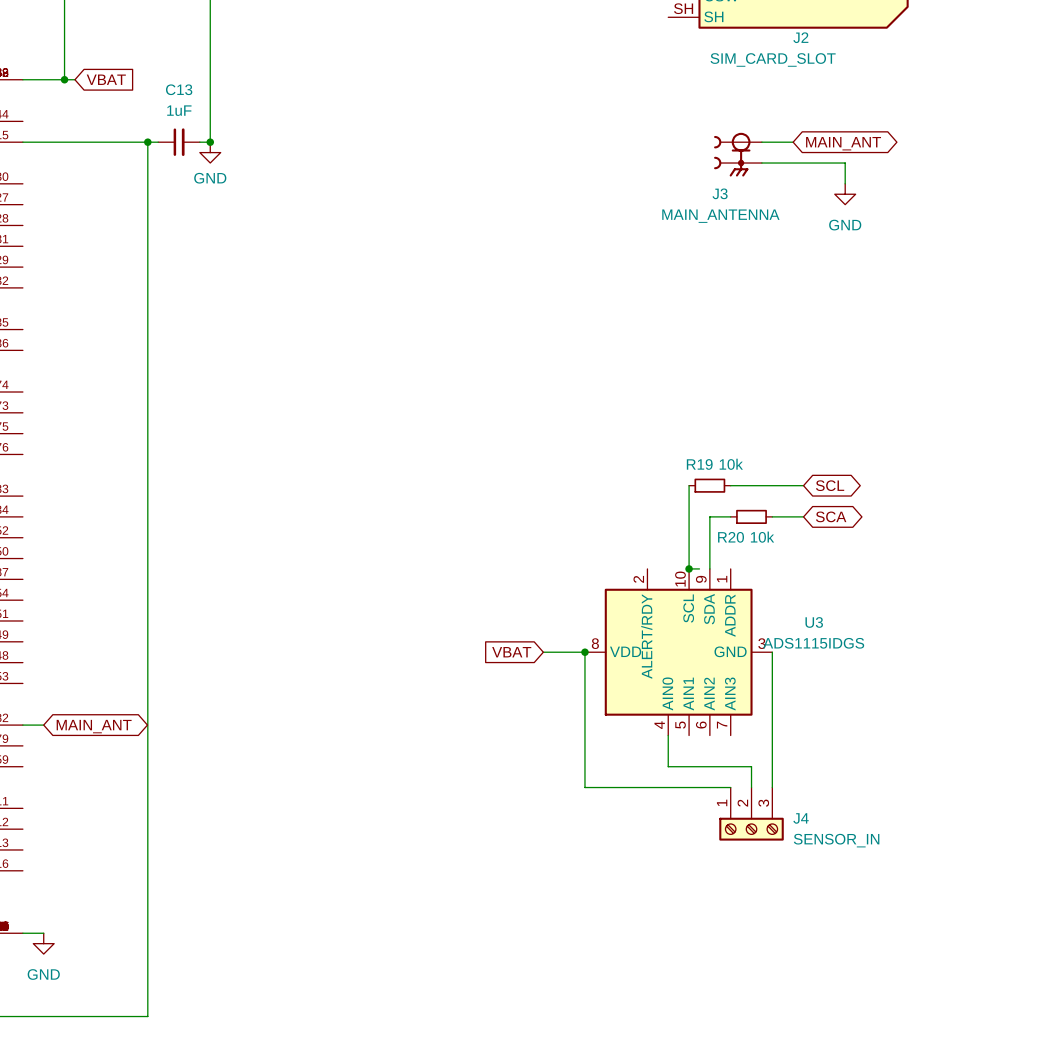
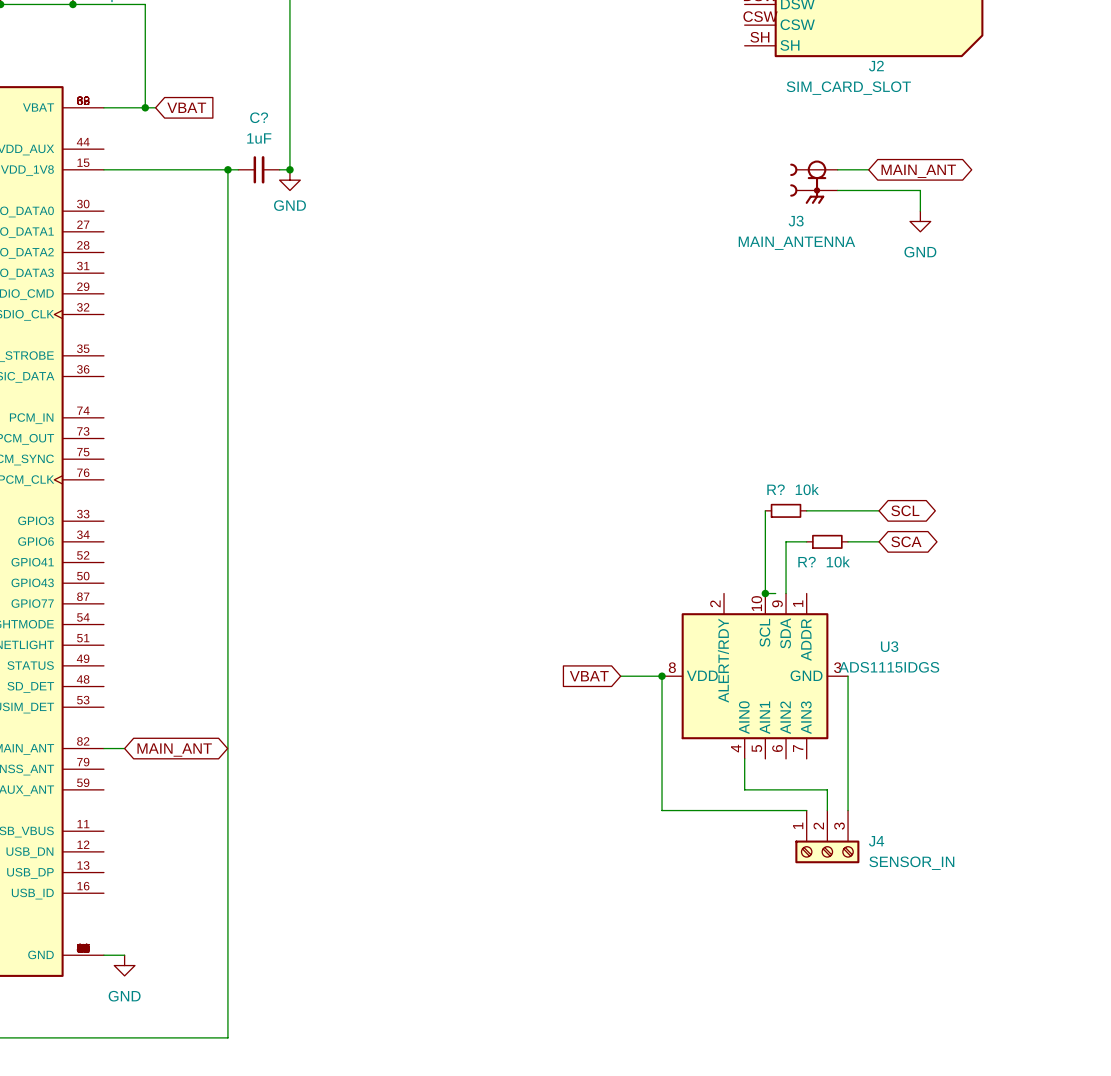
C13 name: C13 (179, 89) -> C? (259, 117)
R19 name: R19 (699, 464) -> R? (776, 489)
R20 name: R20 (731, 537) -> R? (807, 562)

